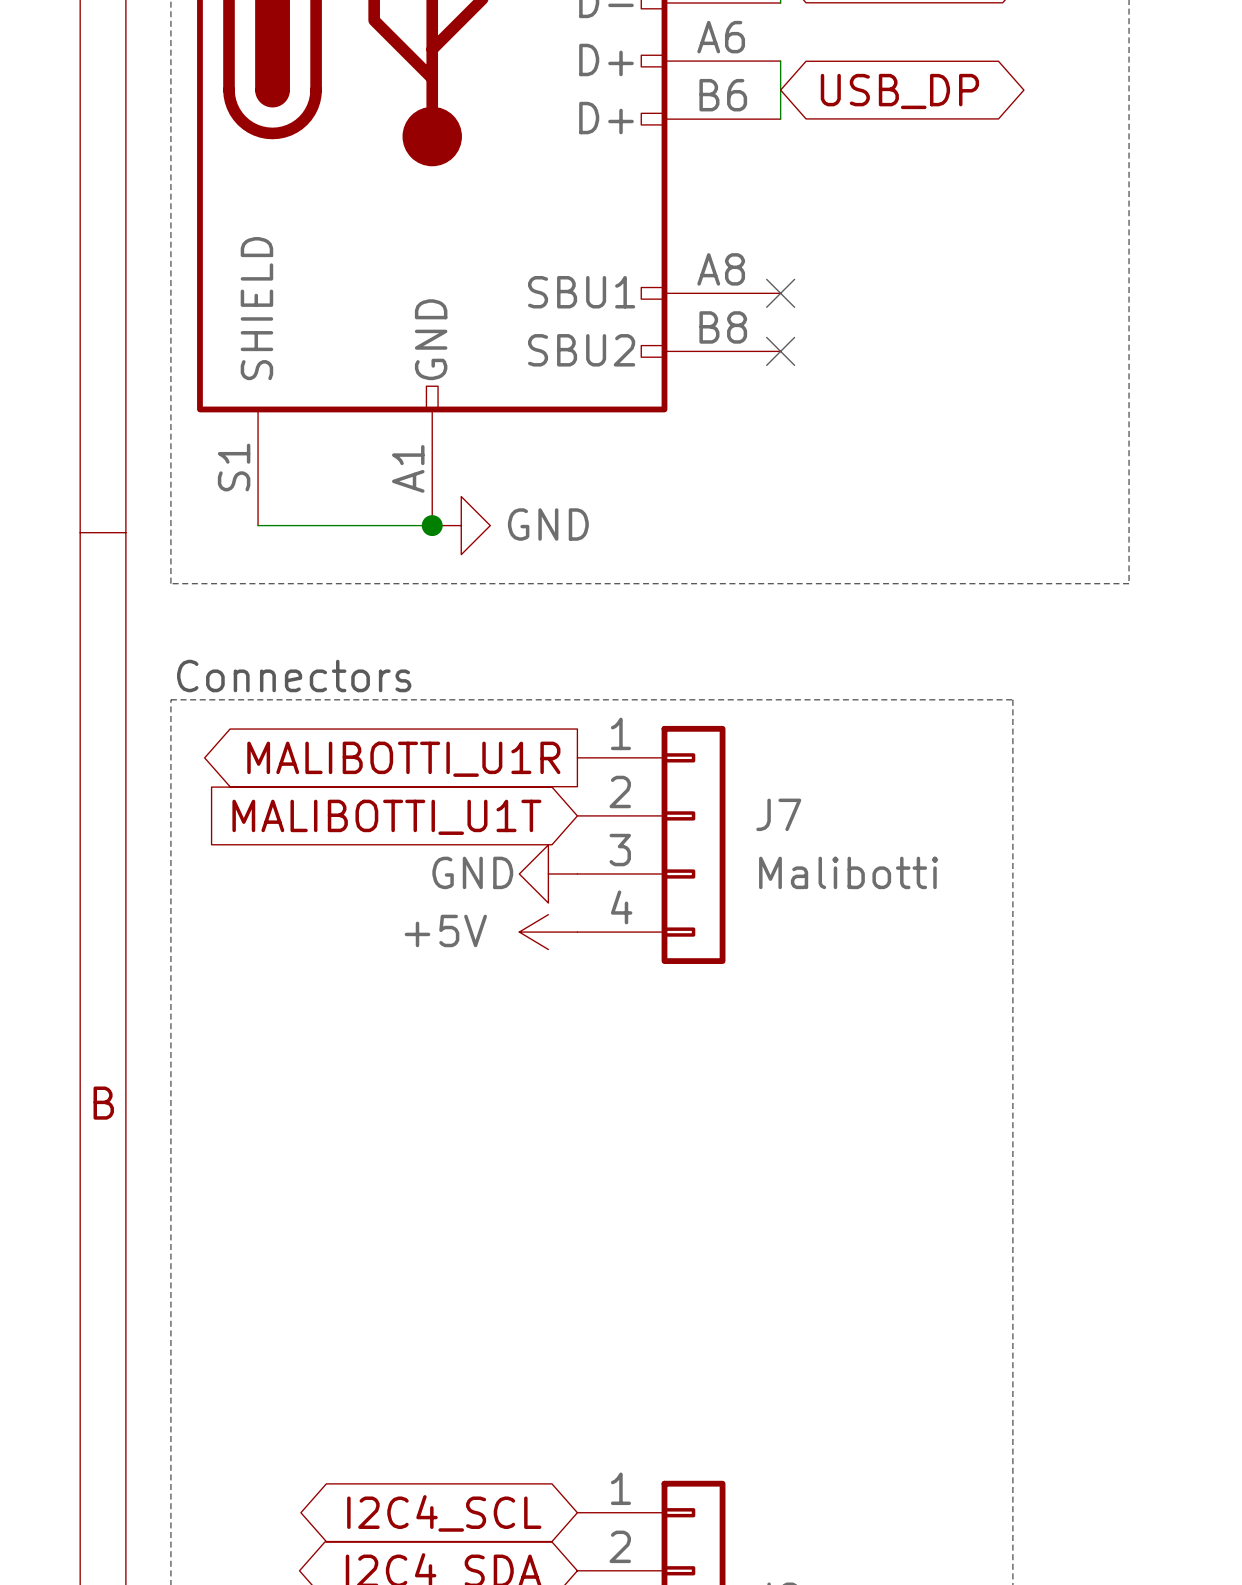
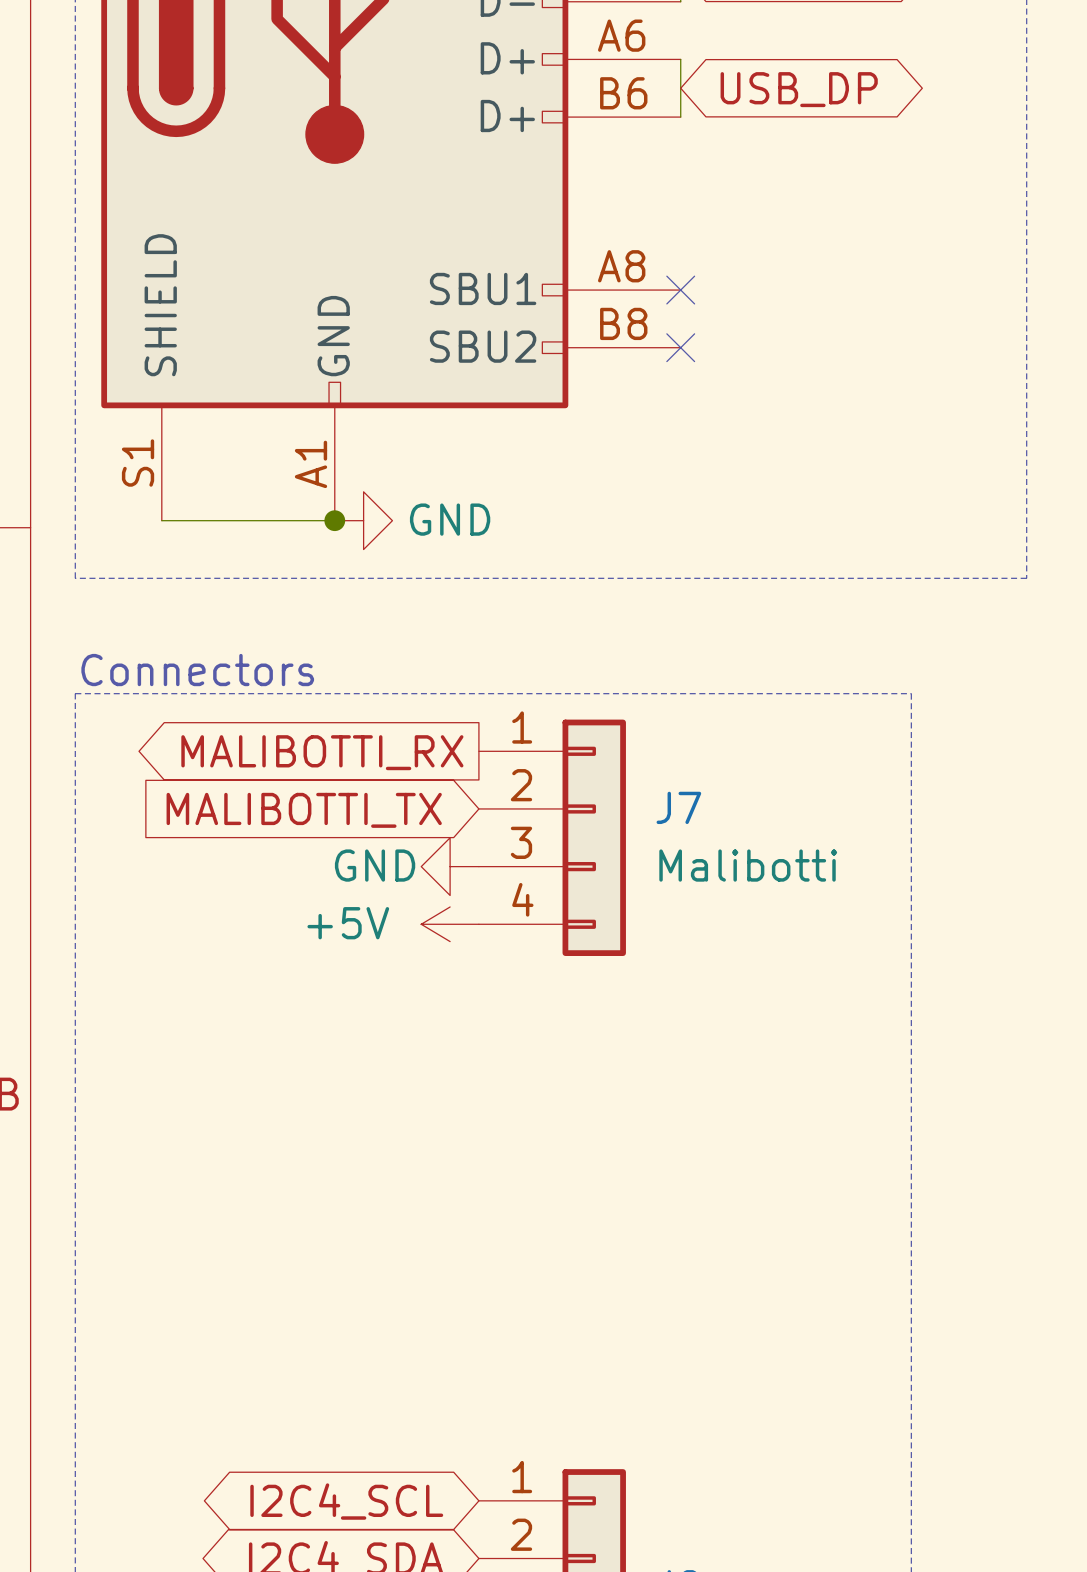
global label: MALIBOTTI_U1R (403, 759) -> MALIBOTTI_RX (322, 752)
global label: MALIBOTTI_U1T (386, 817) -> MALIBOTTI_TX (304, 810)

